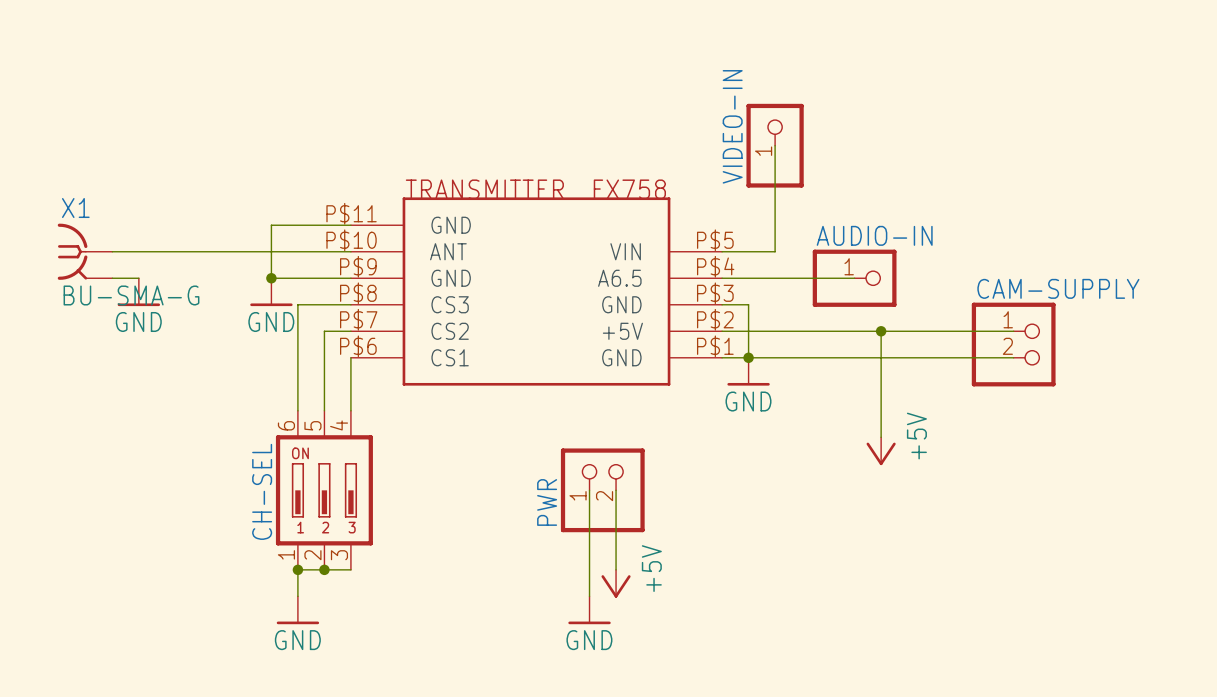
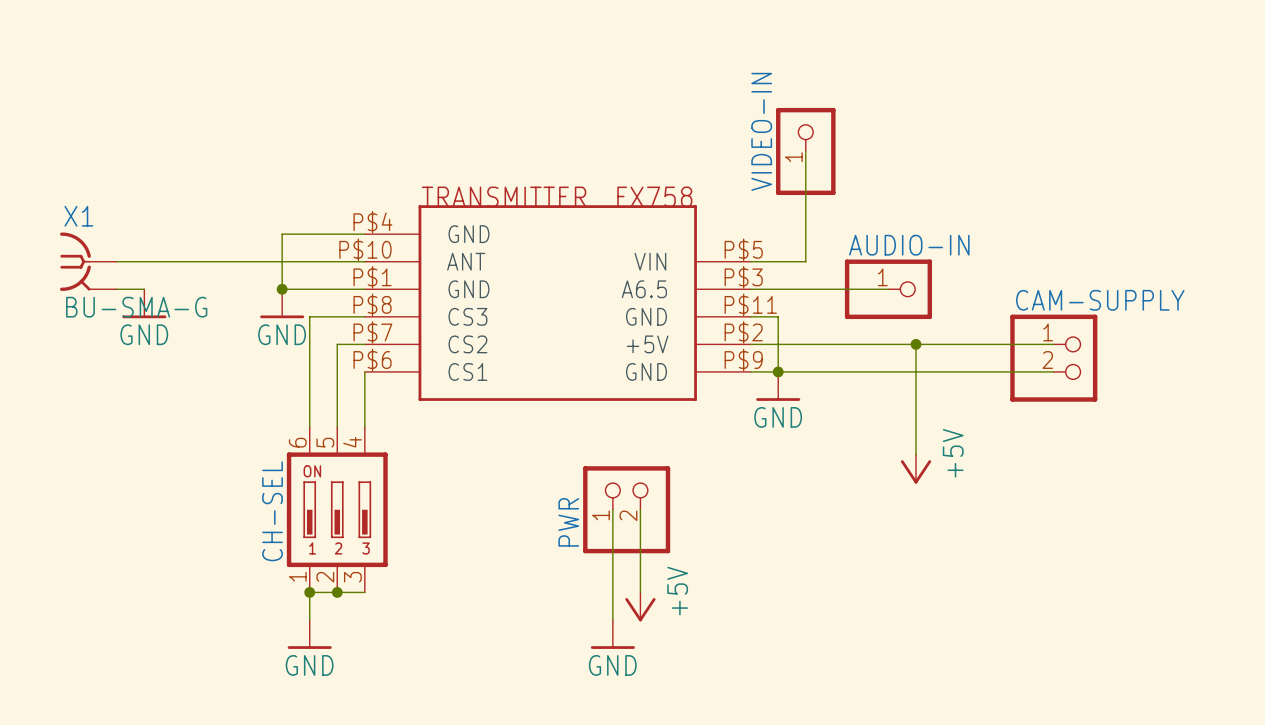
TRANSMITTER pin number: P$11 (351, 213) -> P$4 (372, 222)
TRANSMITTER pin number: P$9 (358, 266) -> P$1 (372, 277)
TRANSMITTER pin number: P$4 (715, 266) -> P$3 (743, 277)
TRANSMITTER pin number: P$3 (715, 293) -> P$11 (750, 304)
TRANSMITTER pin number: P$1 (715, 346) -> P$9 (743, 360)

